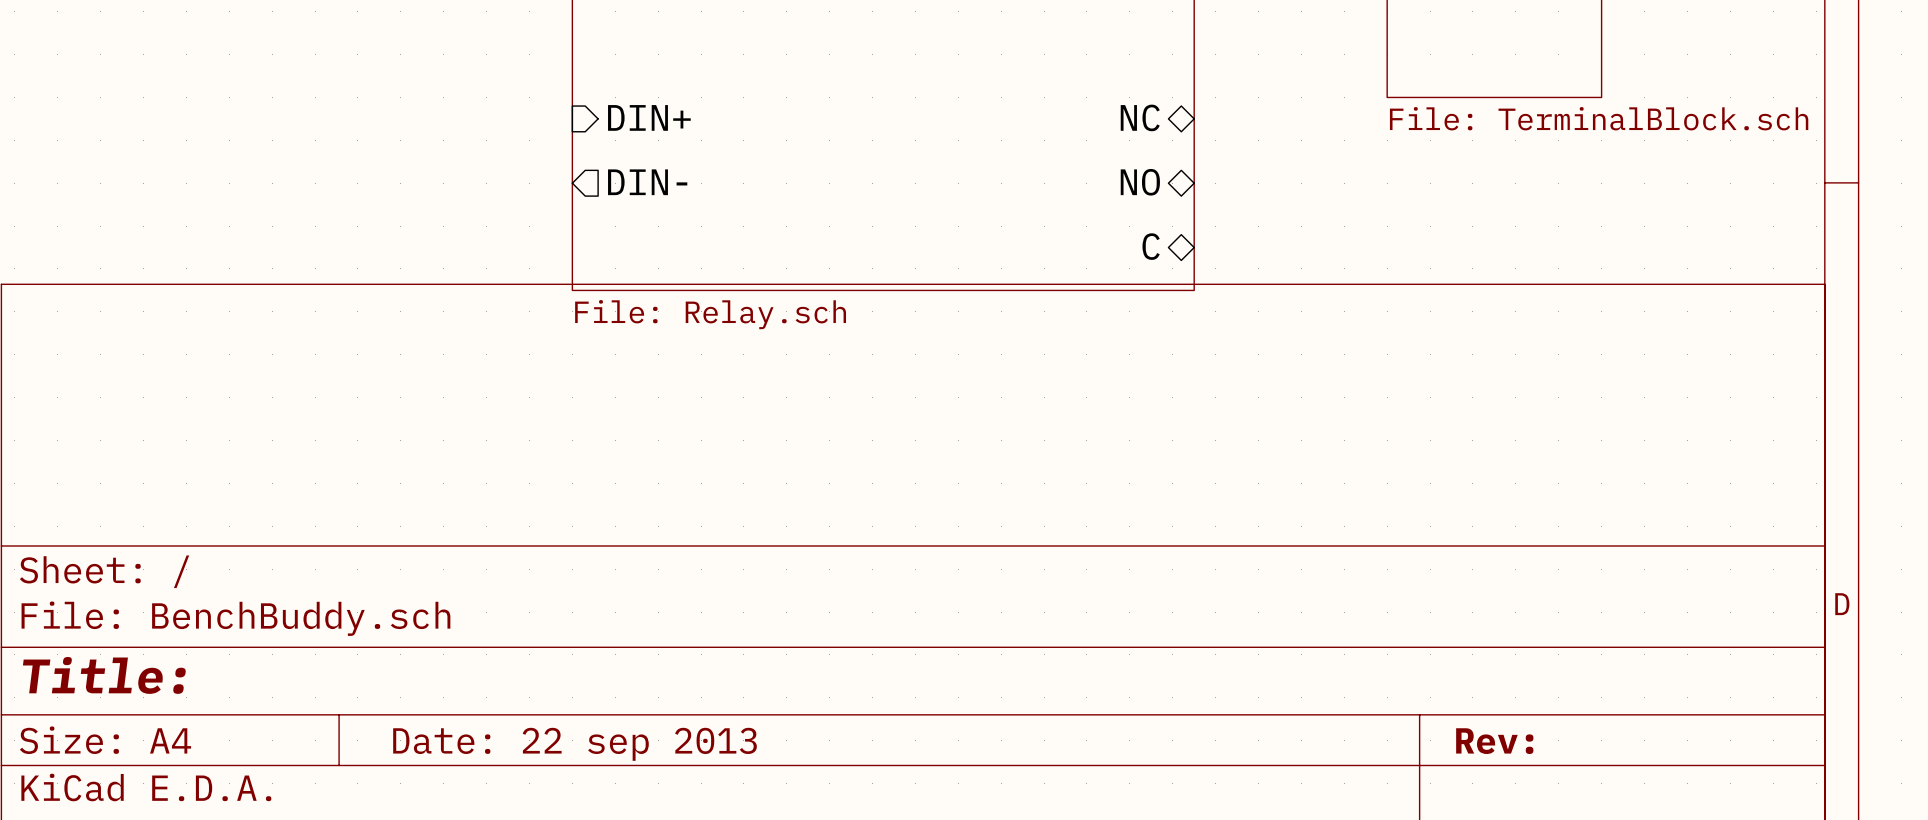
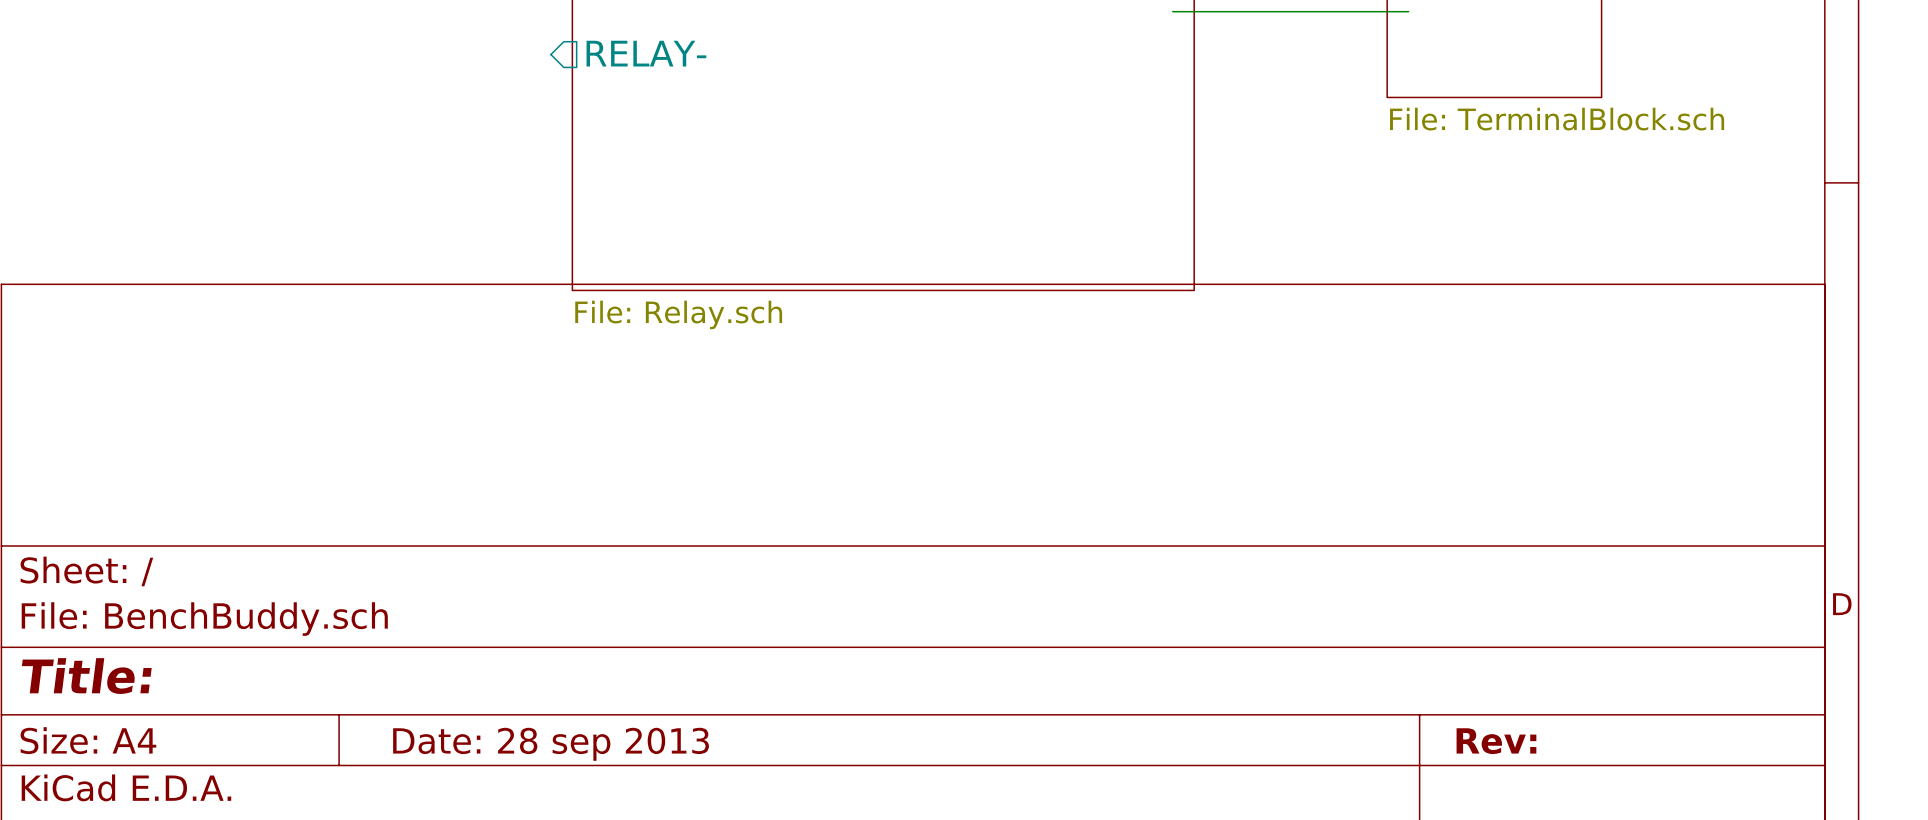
wire: none -> (1172, 11) (1408, 11)
sheet pin: none -> RELAY- (646, 53)
sheet pin: DIN+ (649, 117) -> none
sheet pin: NC (1140, 117) -> none
sheet pin: DIN- (647, 182) -> none
sheet pin: NO (1140, 182) -> none
sheet pin: C (1151, 246) -> none
title block: Date: 22 sep 2013 (575, 744) -> Date: 28 sep 2013 (551, 744)

